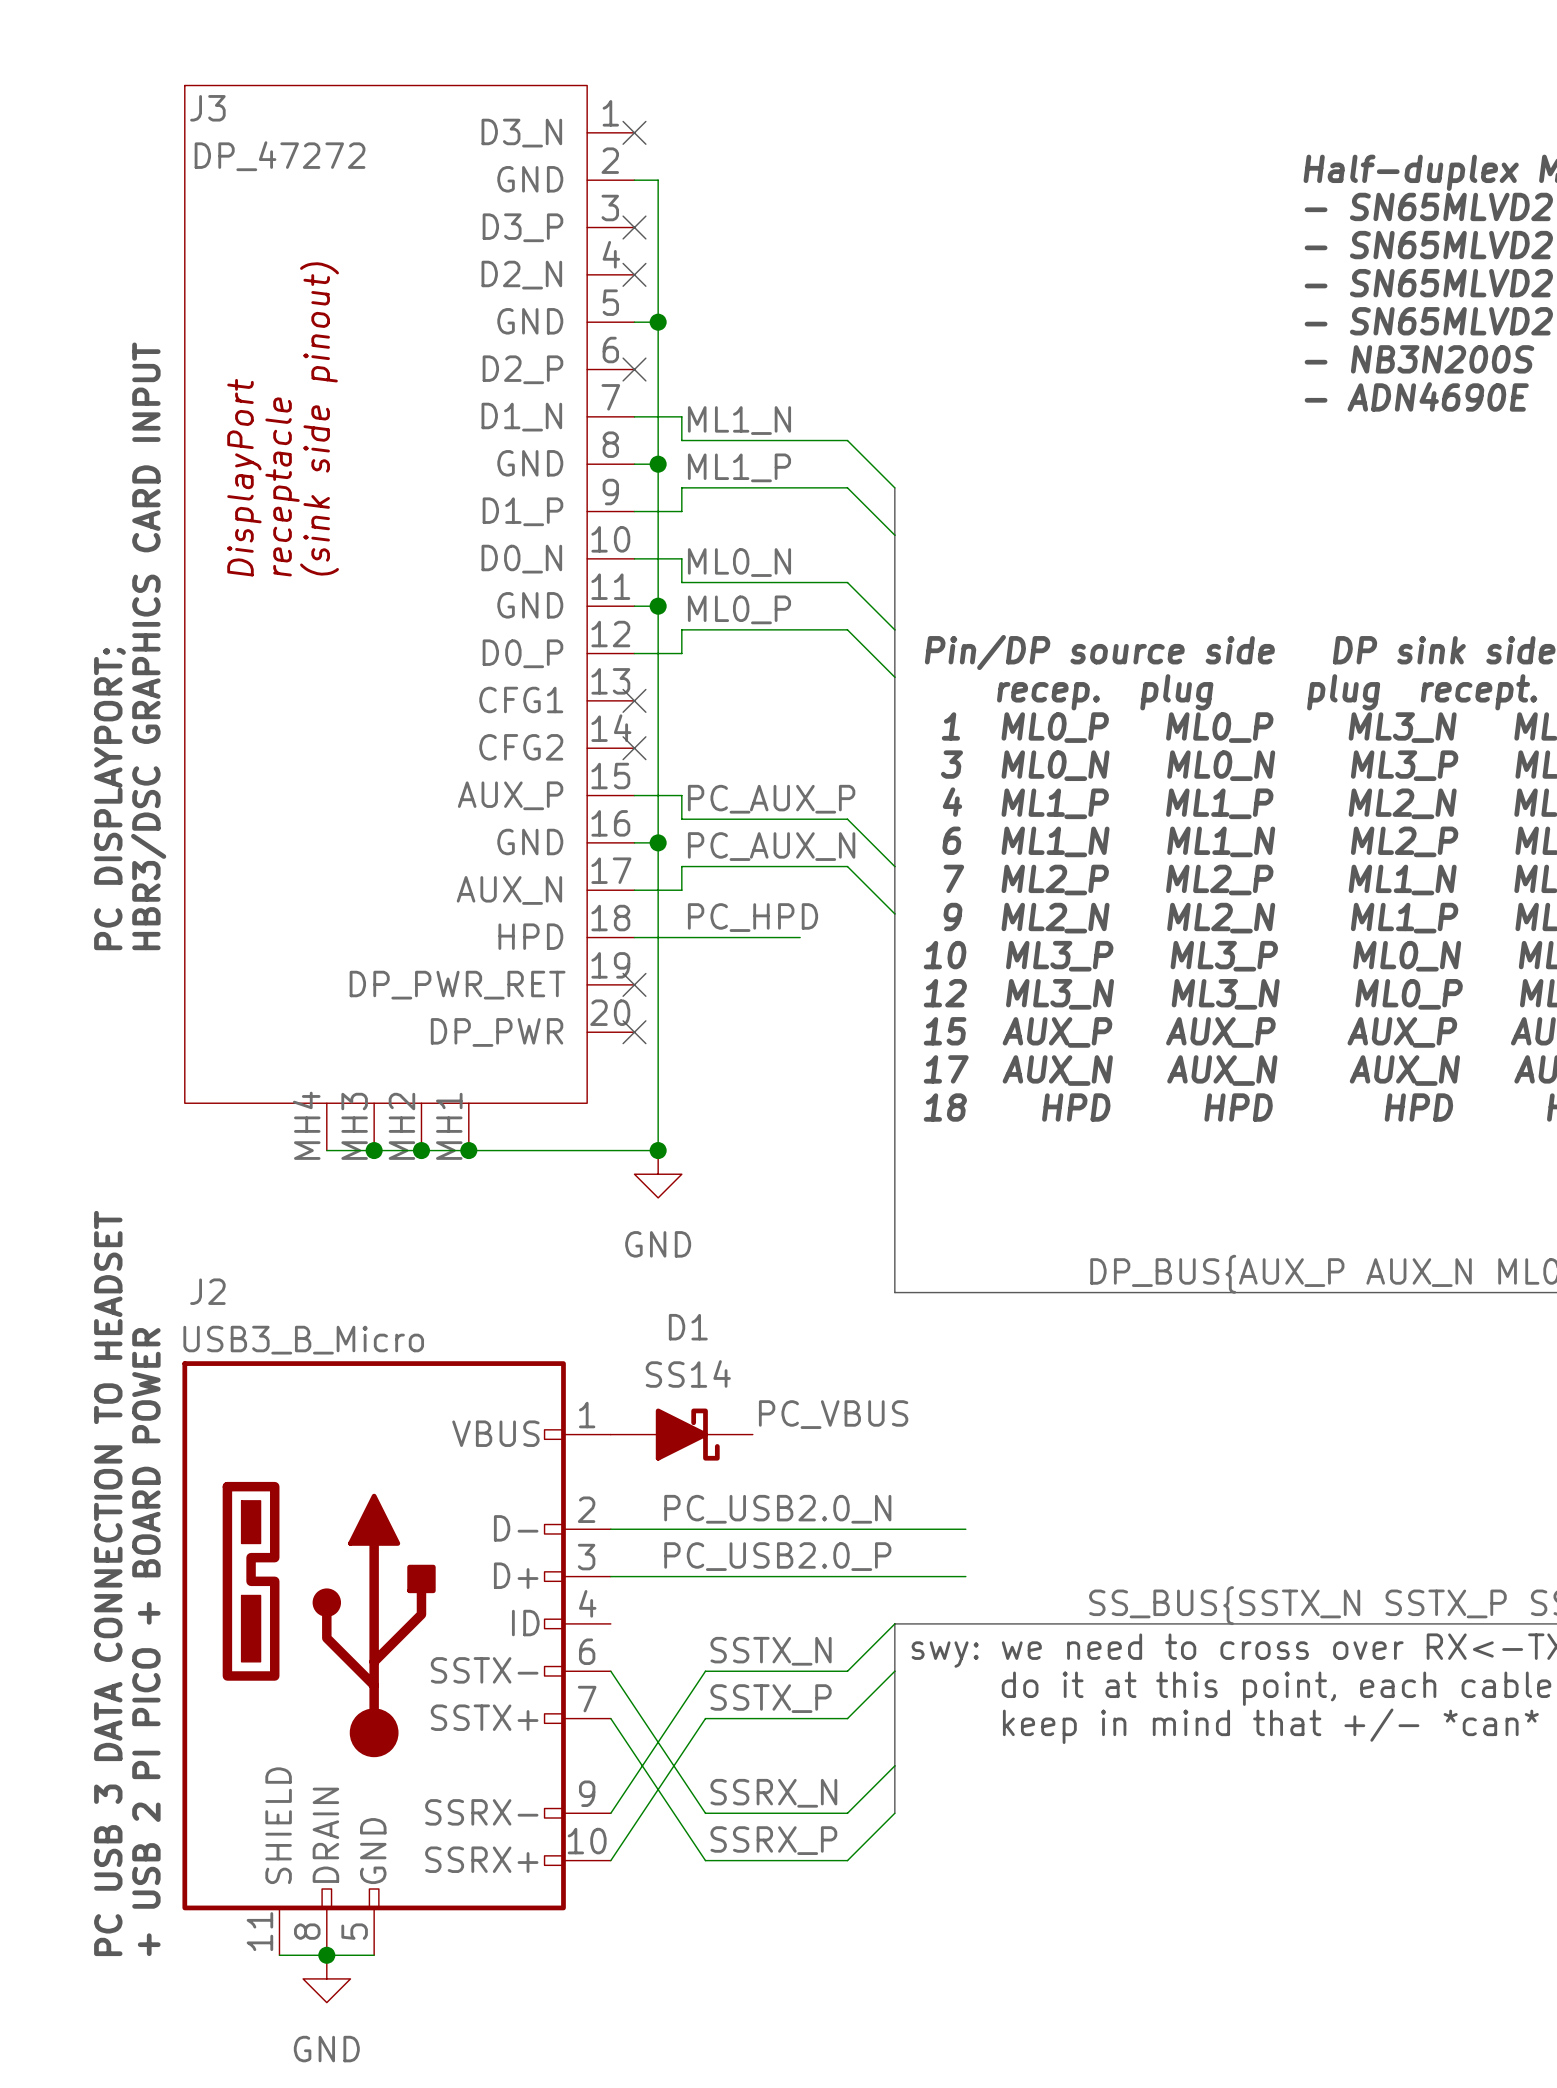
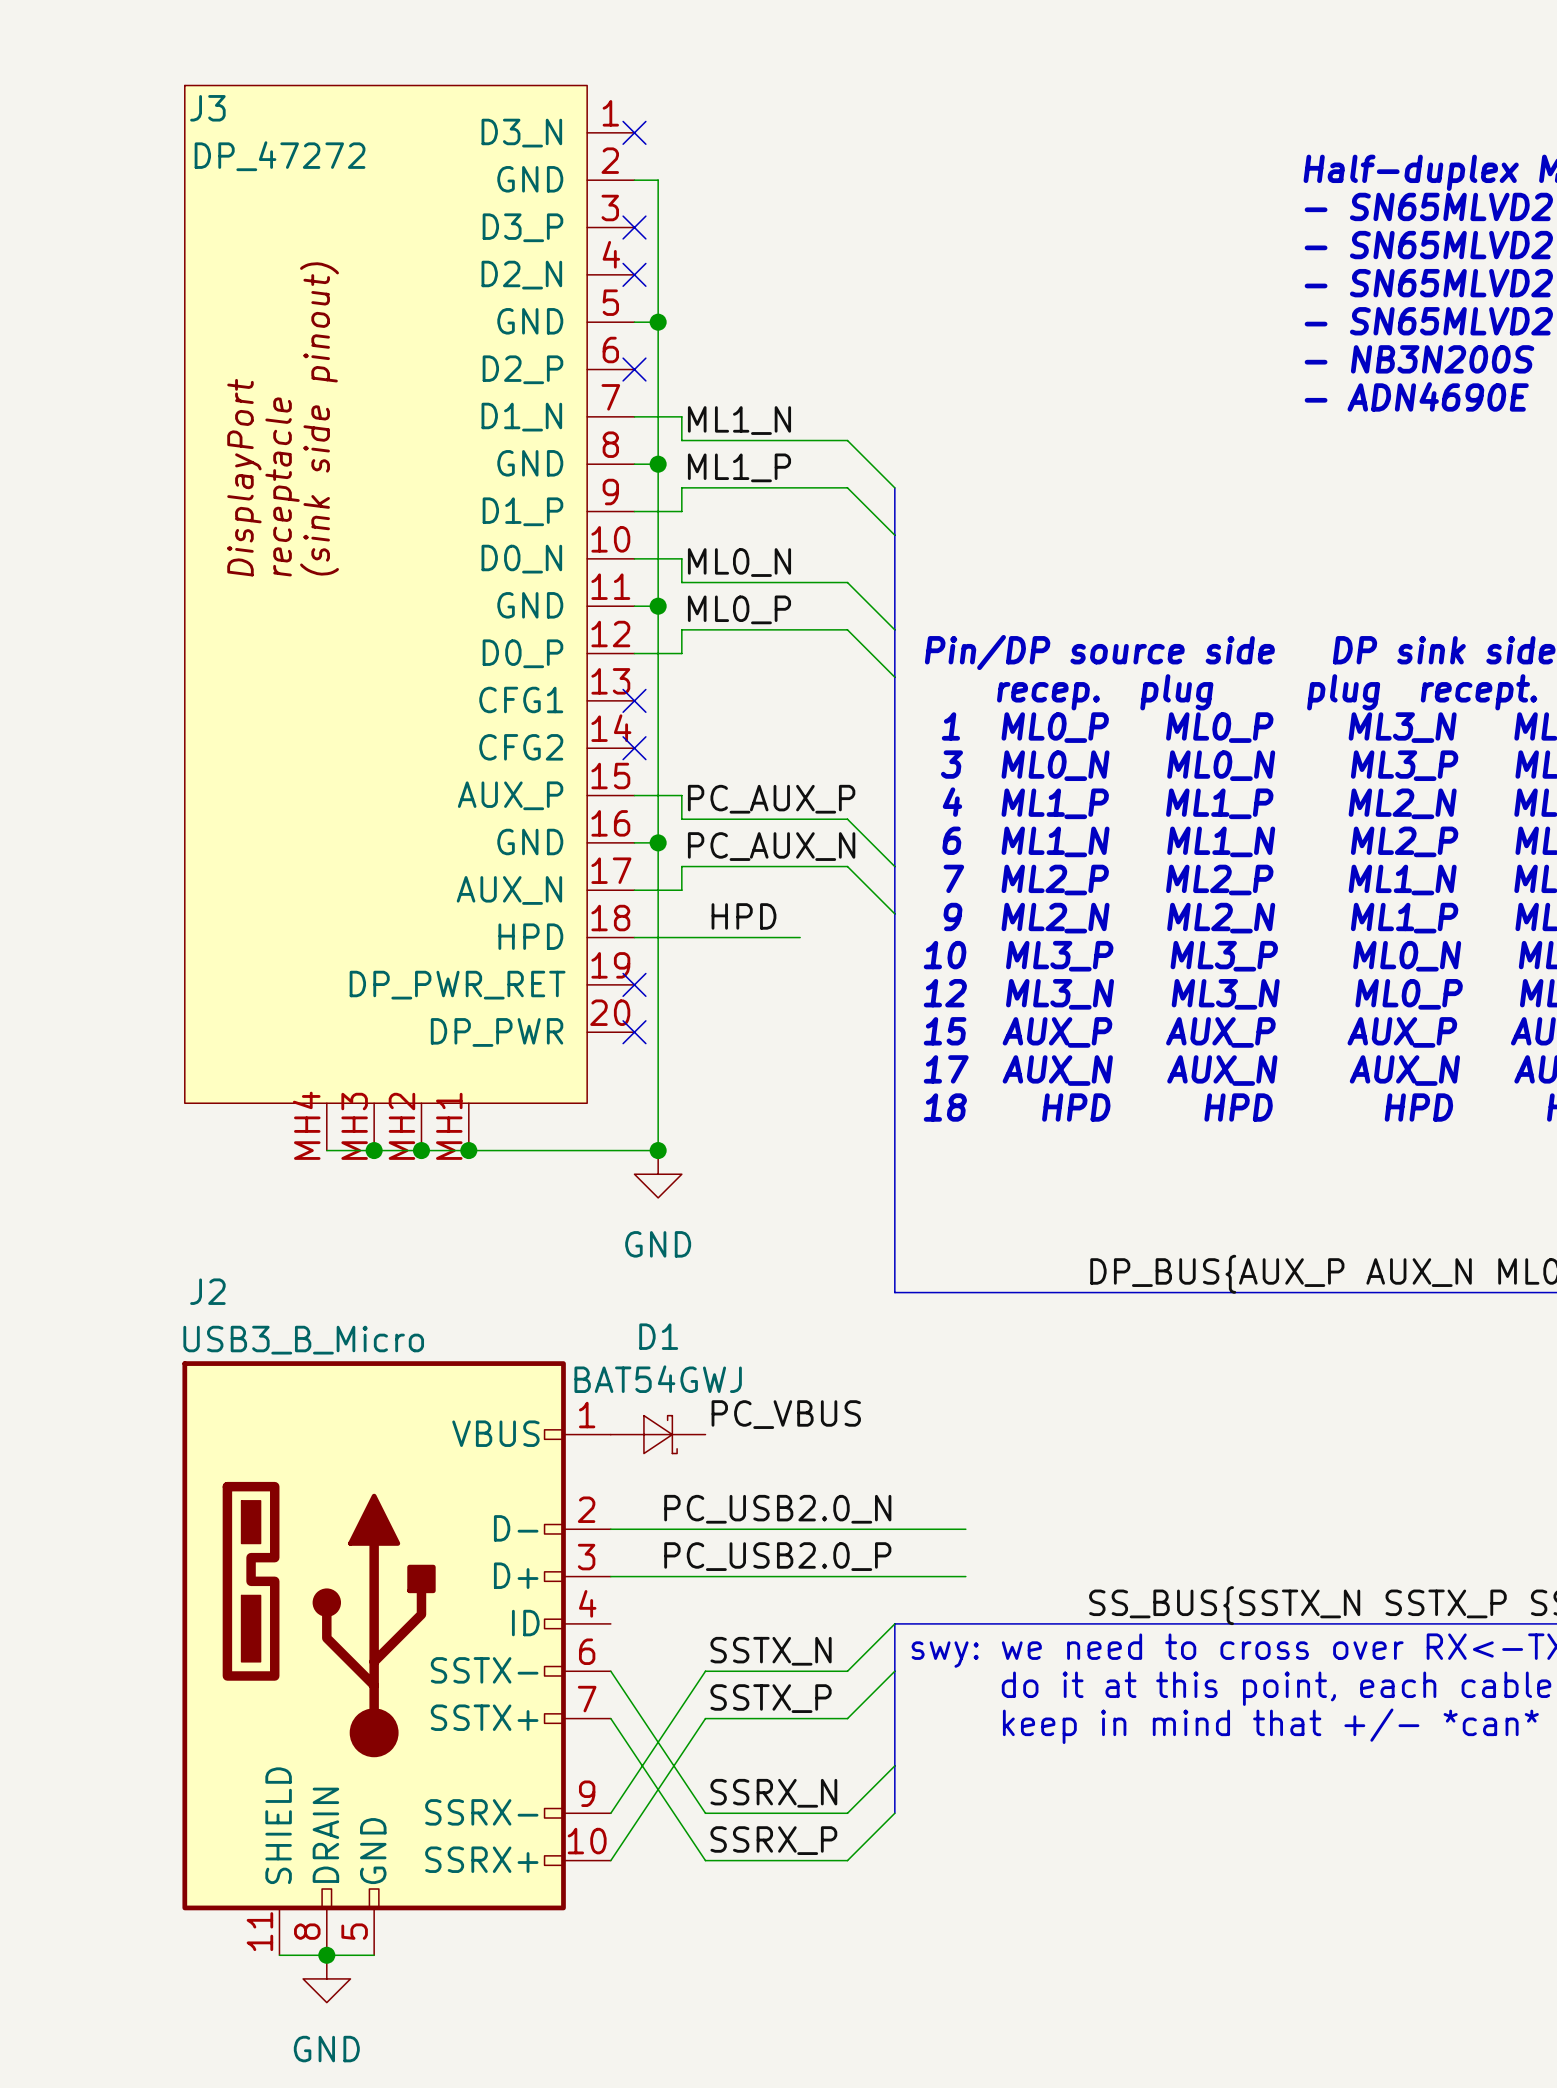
text: HBR3/DSC GRAPHICS CARD INPUT (148, 646) -> none
text: PC DISPLAYPORT; (109, 799) -> none
label: PC_HPD (753, 917) -> HPD (743, 916)
D1 value: SS14 (688, 1373) -> BAT54GWJ (658, 1379)
D1 symbol: [610, 1408, 753, 1461] -> [610, 1415, 706, 1454]
label position: PC_VBUS (833, 1414) -> PC_VBUS (786, 1414)
text: PC USB 3 DATA CONNECTION TO HEADSET (108, 1583) -> none
text: + USB 2 PI PICO + BOARD POWER (146, 1642) -> none

